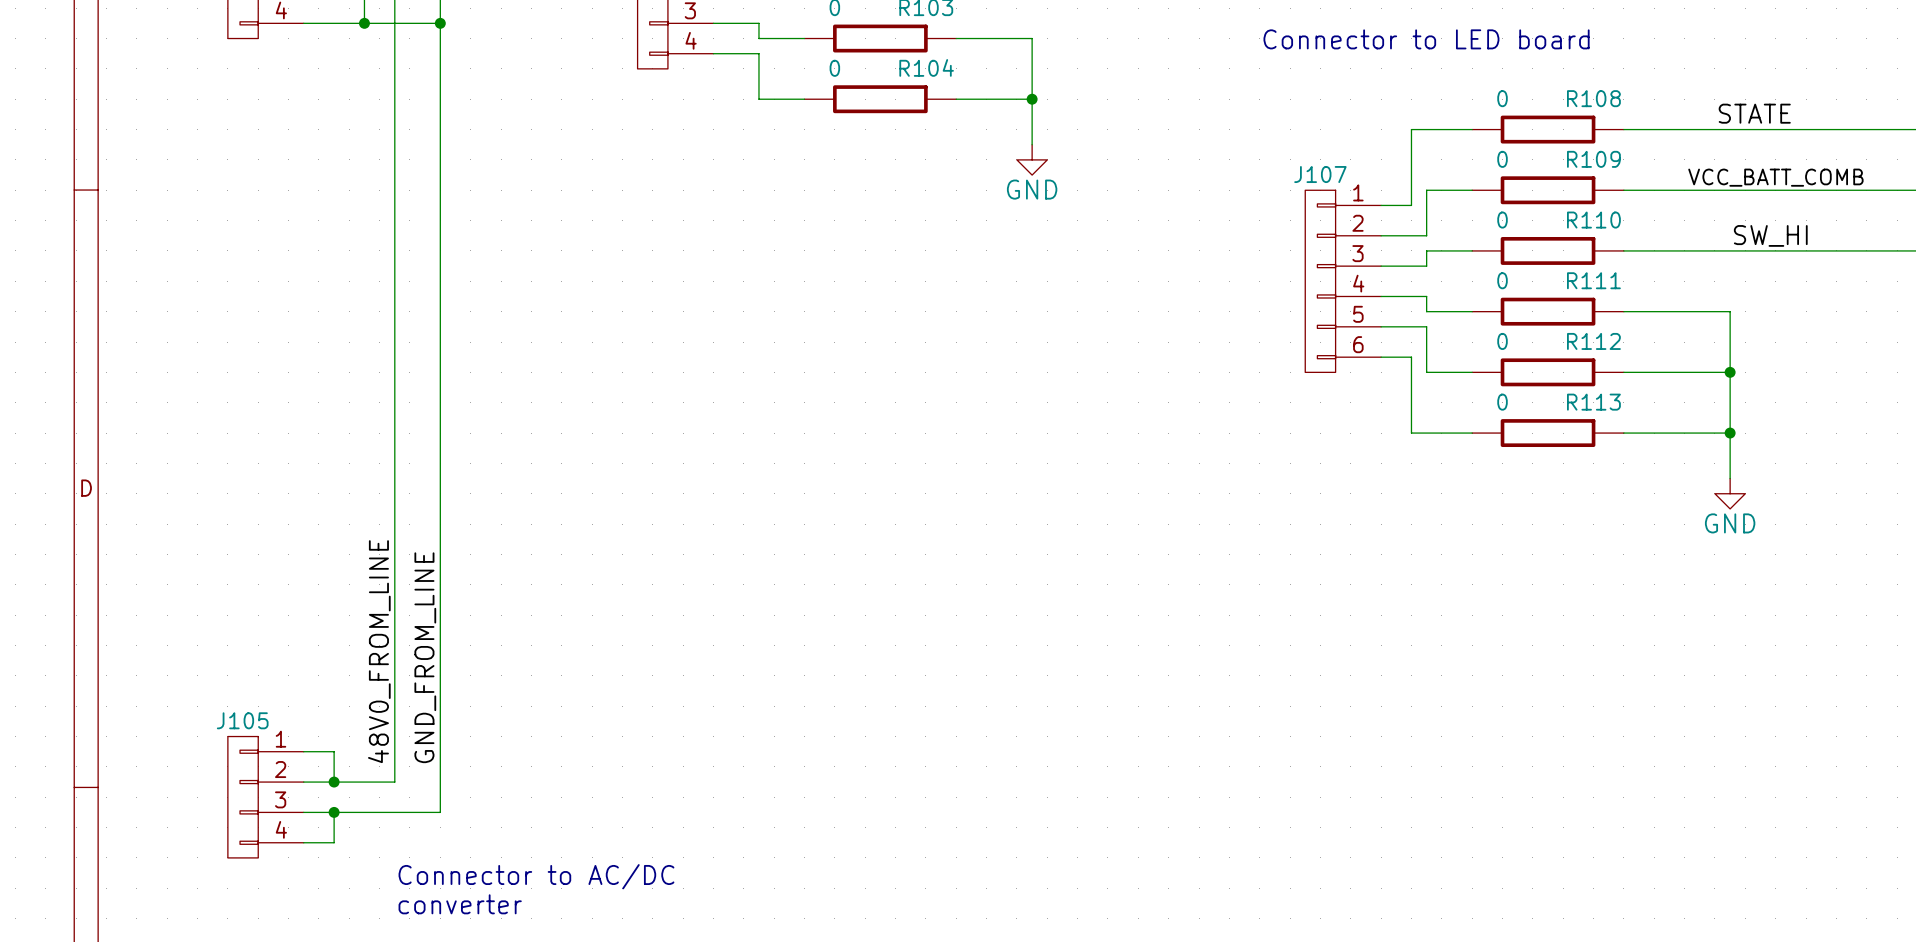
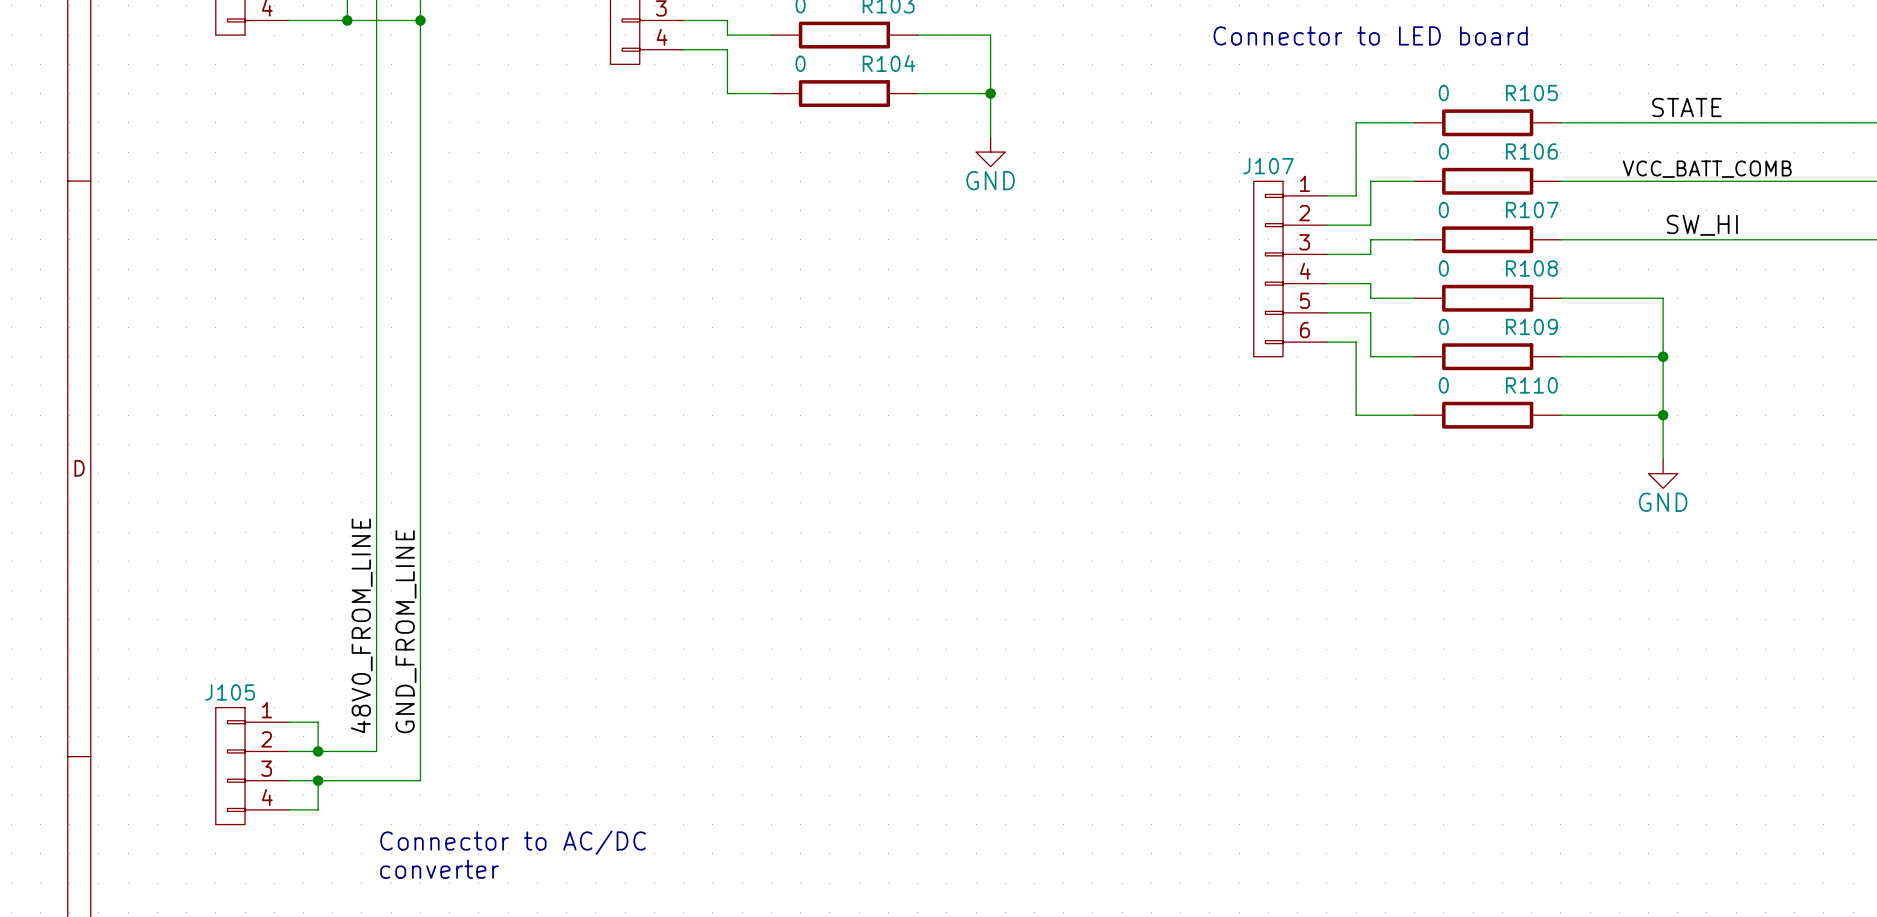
R108 name: R108 (1593, 98) -> R105 (1531, 93)
R109 name: R109 (1593, 159) -> R106 (1531, 151)
R110 name: R110 (1593, 220) -> R107 (1532, 209)
R111 name: R111 (1593, 280) -> R108 (1531, 268)
R112 name: R112 (1593, 341) -> R109 (1531, 326)
R113 name: R113 (1593, 402) -> R110 (1531, 385)

